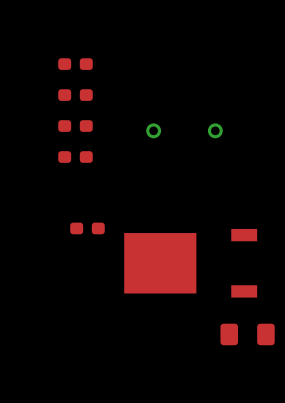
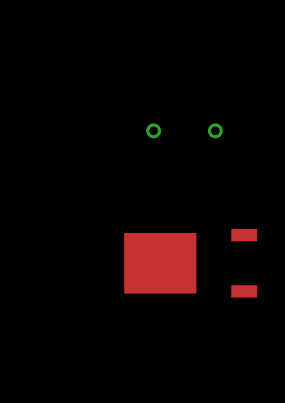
part: (75, 64) -> none
part: (75, 95) -> none
part: (75, 126) -> none
part: (75, 157) -> none
part: (87, 228) -> none
part: (247, 334) -> none

